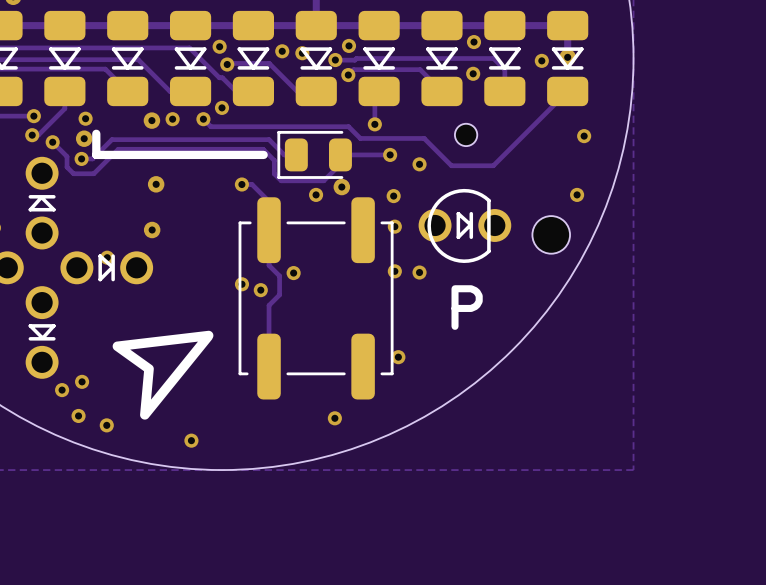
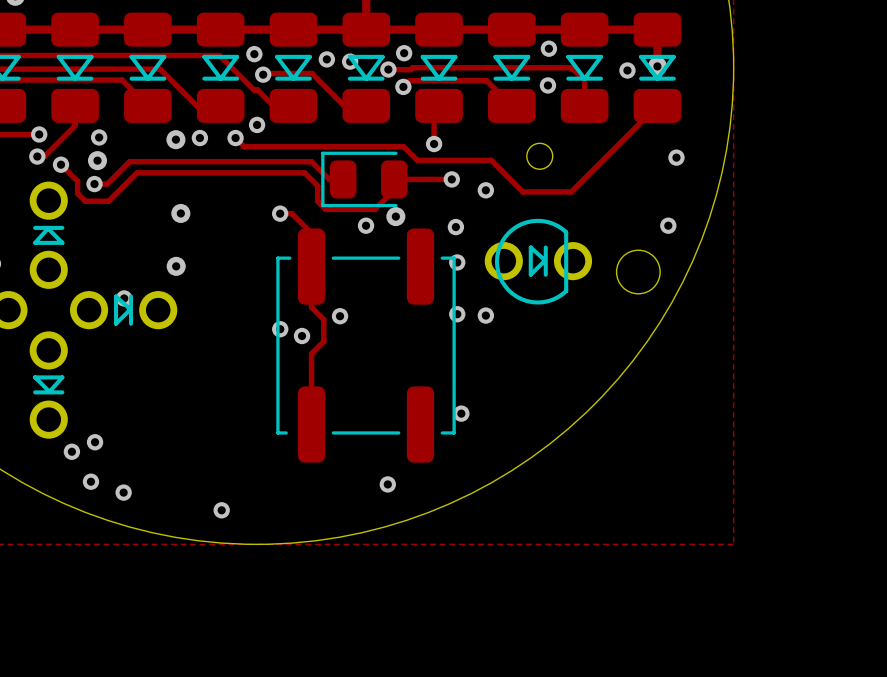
line: (96, 133) (96, 154) (263, 154) -> none
text: P (467, 307) -> none
drawing: [112, 330, 214, 420] -> none

